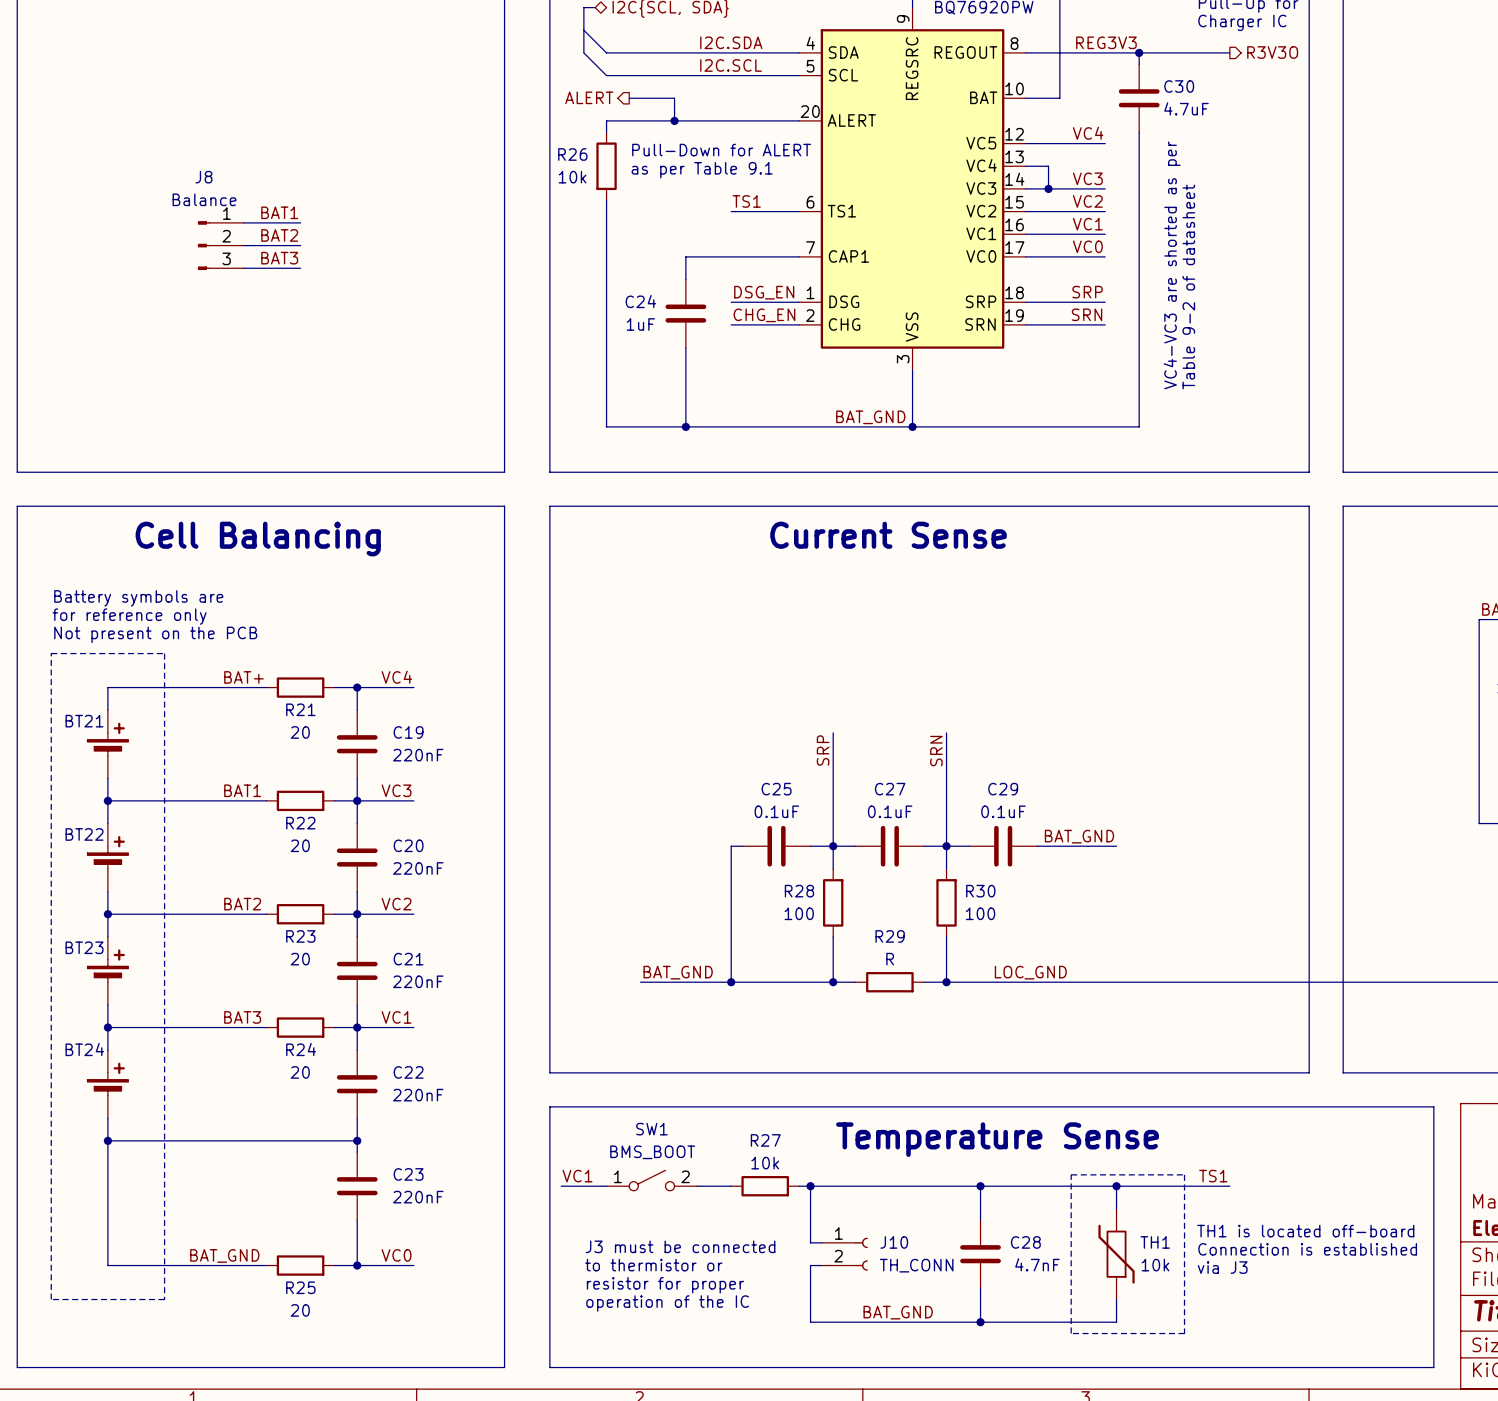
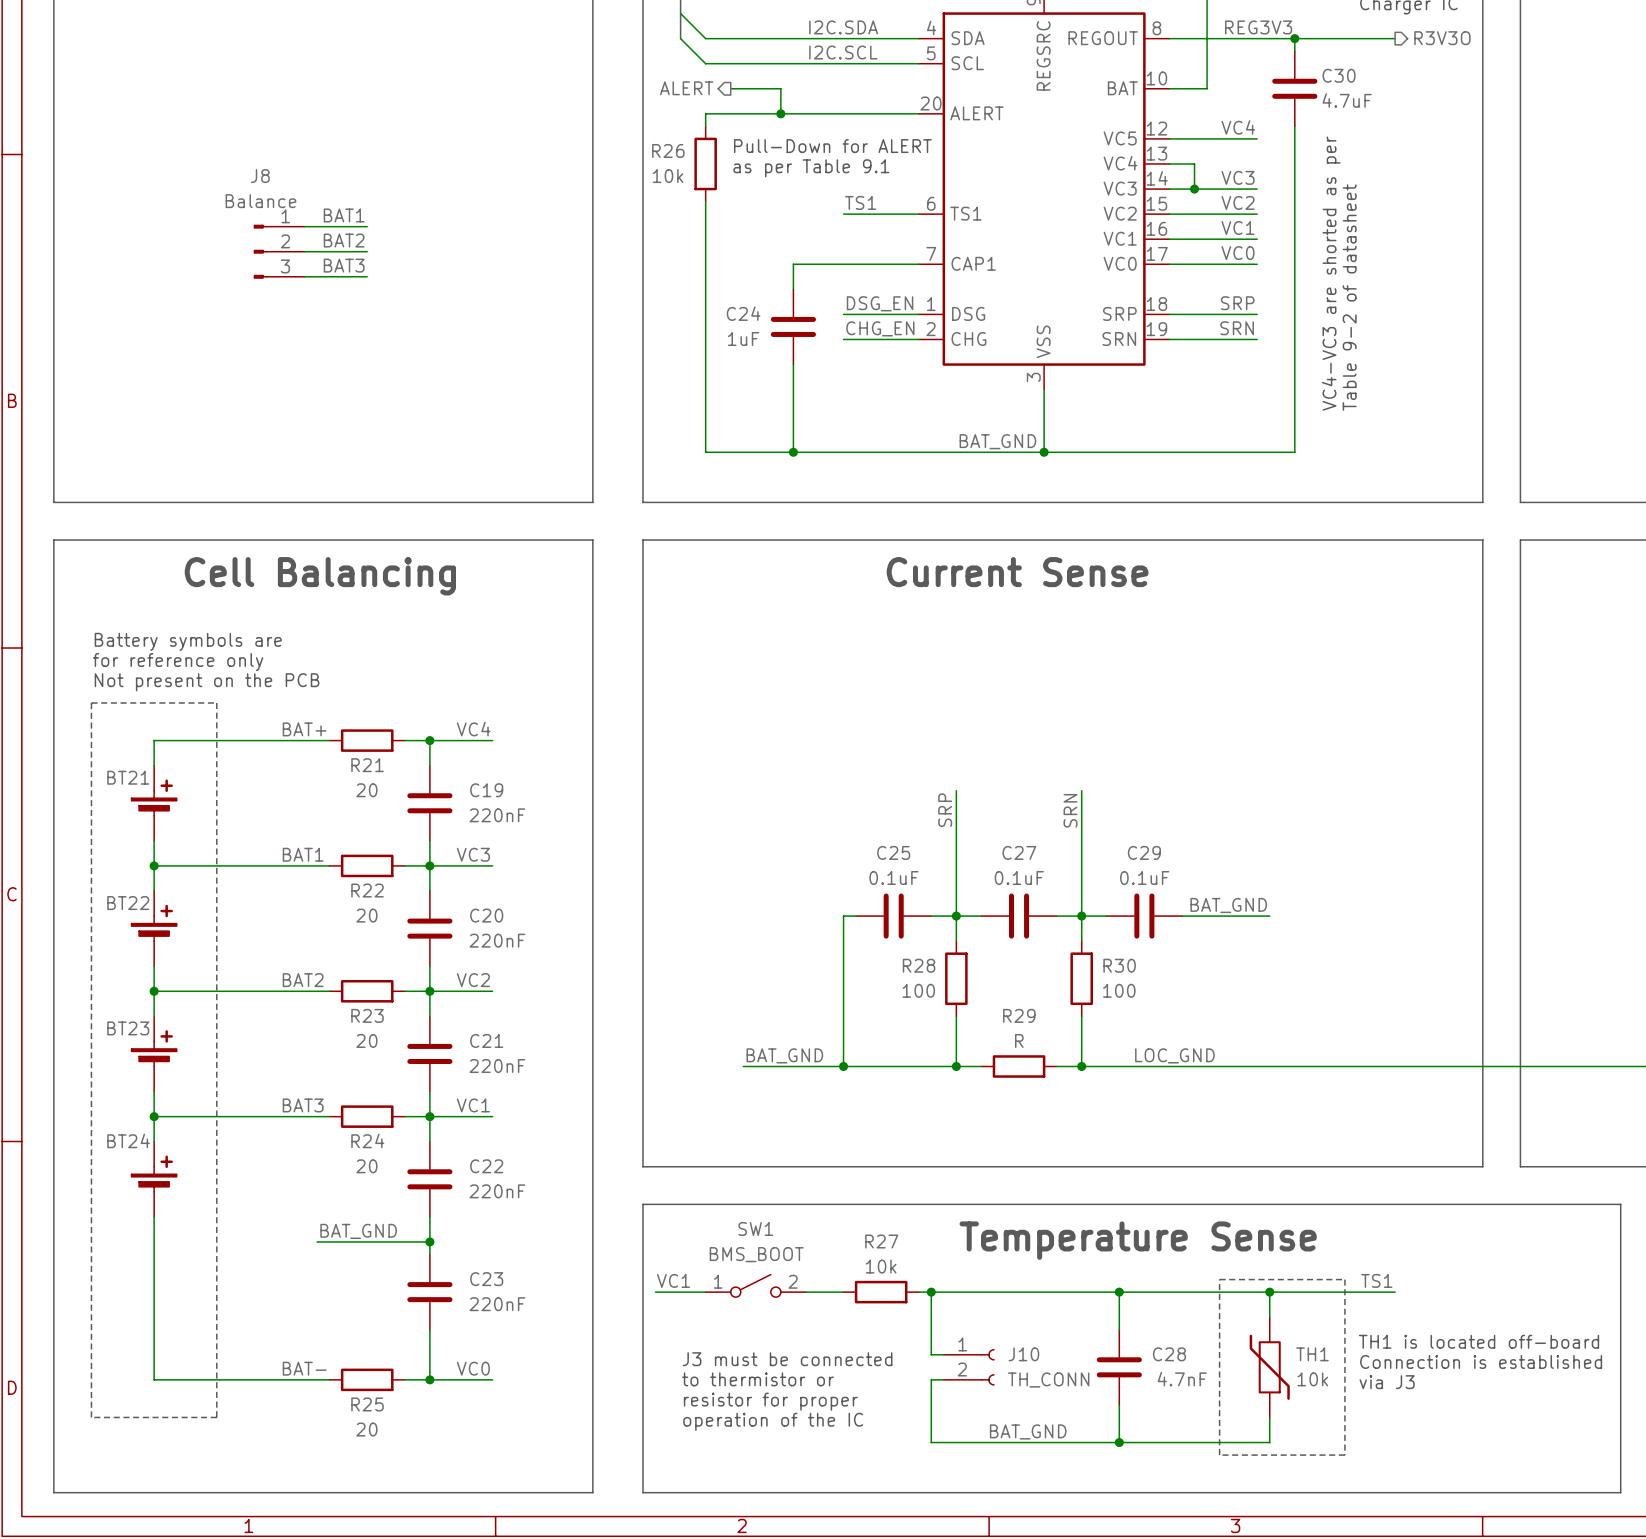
wire: (107, 1140) (255, 1140) -> none
junction: (107, 1140) -> none
label position: BAT_GND (224, 1255) -> BAT_GND (358, 1231)
label: none -> BAT- (304, 1368)

